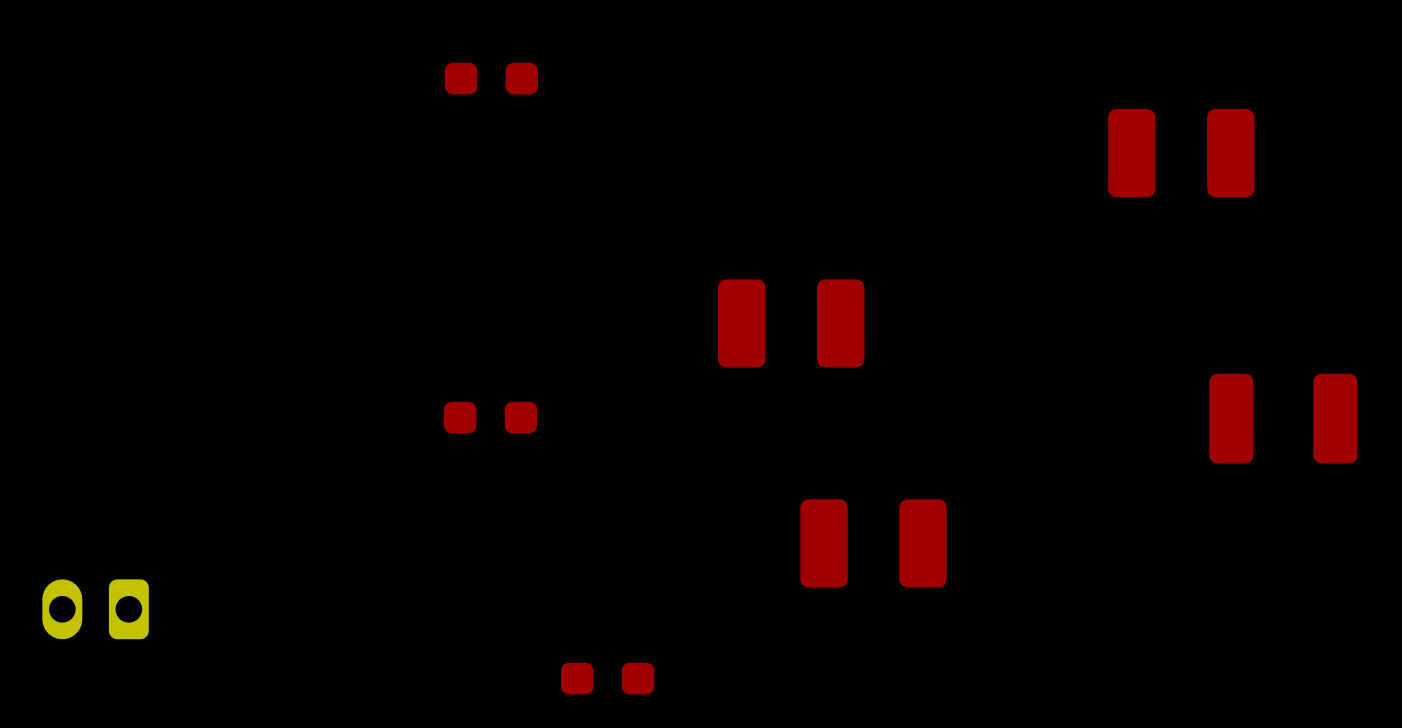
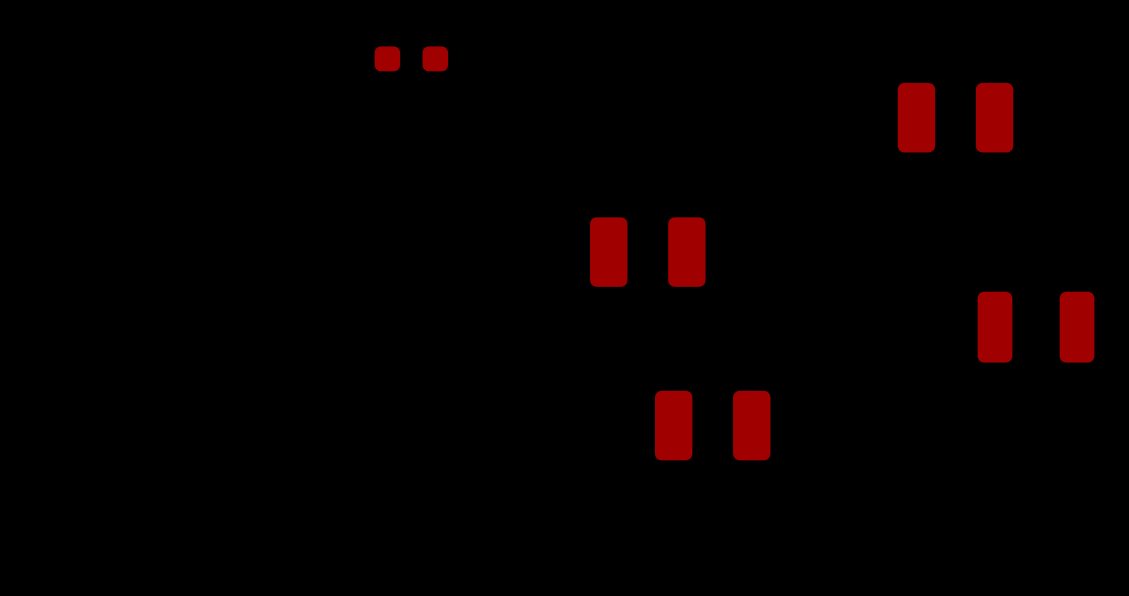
part: (490, 417) -> none
part: (95, 609) -> none
part: (607, 678) -> none

